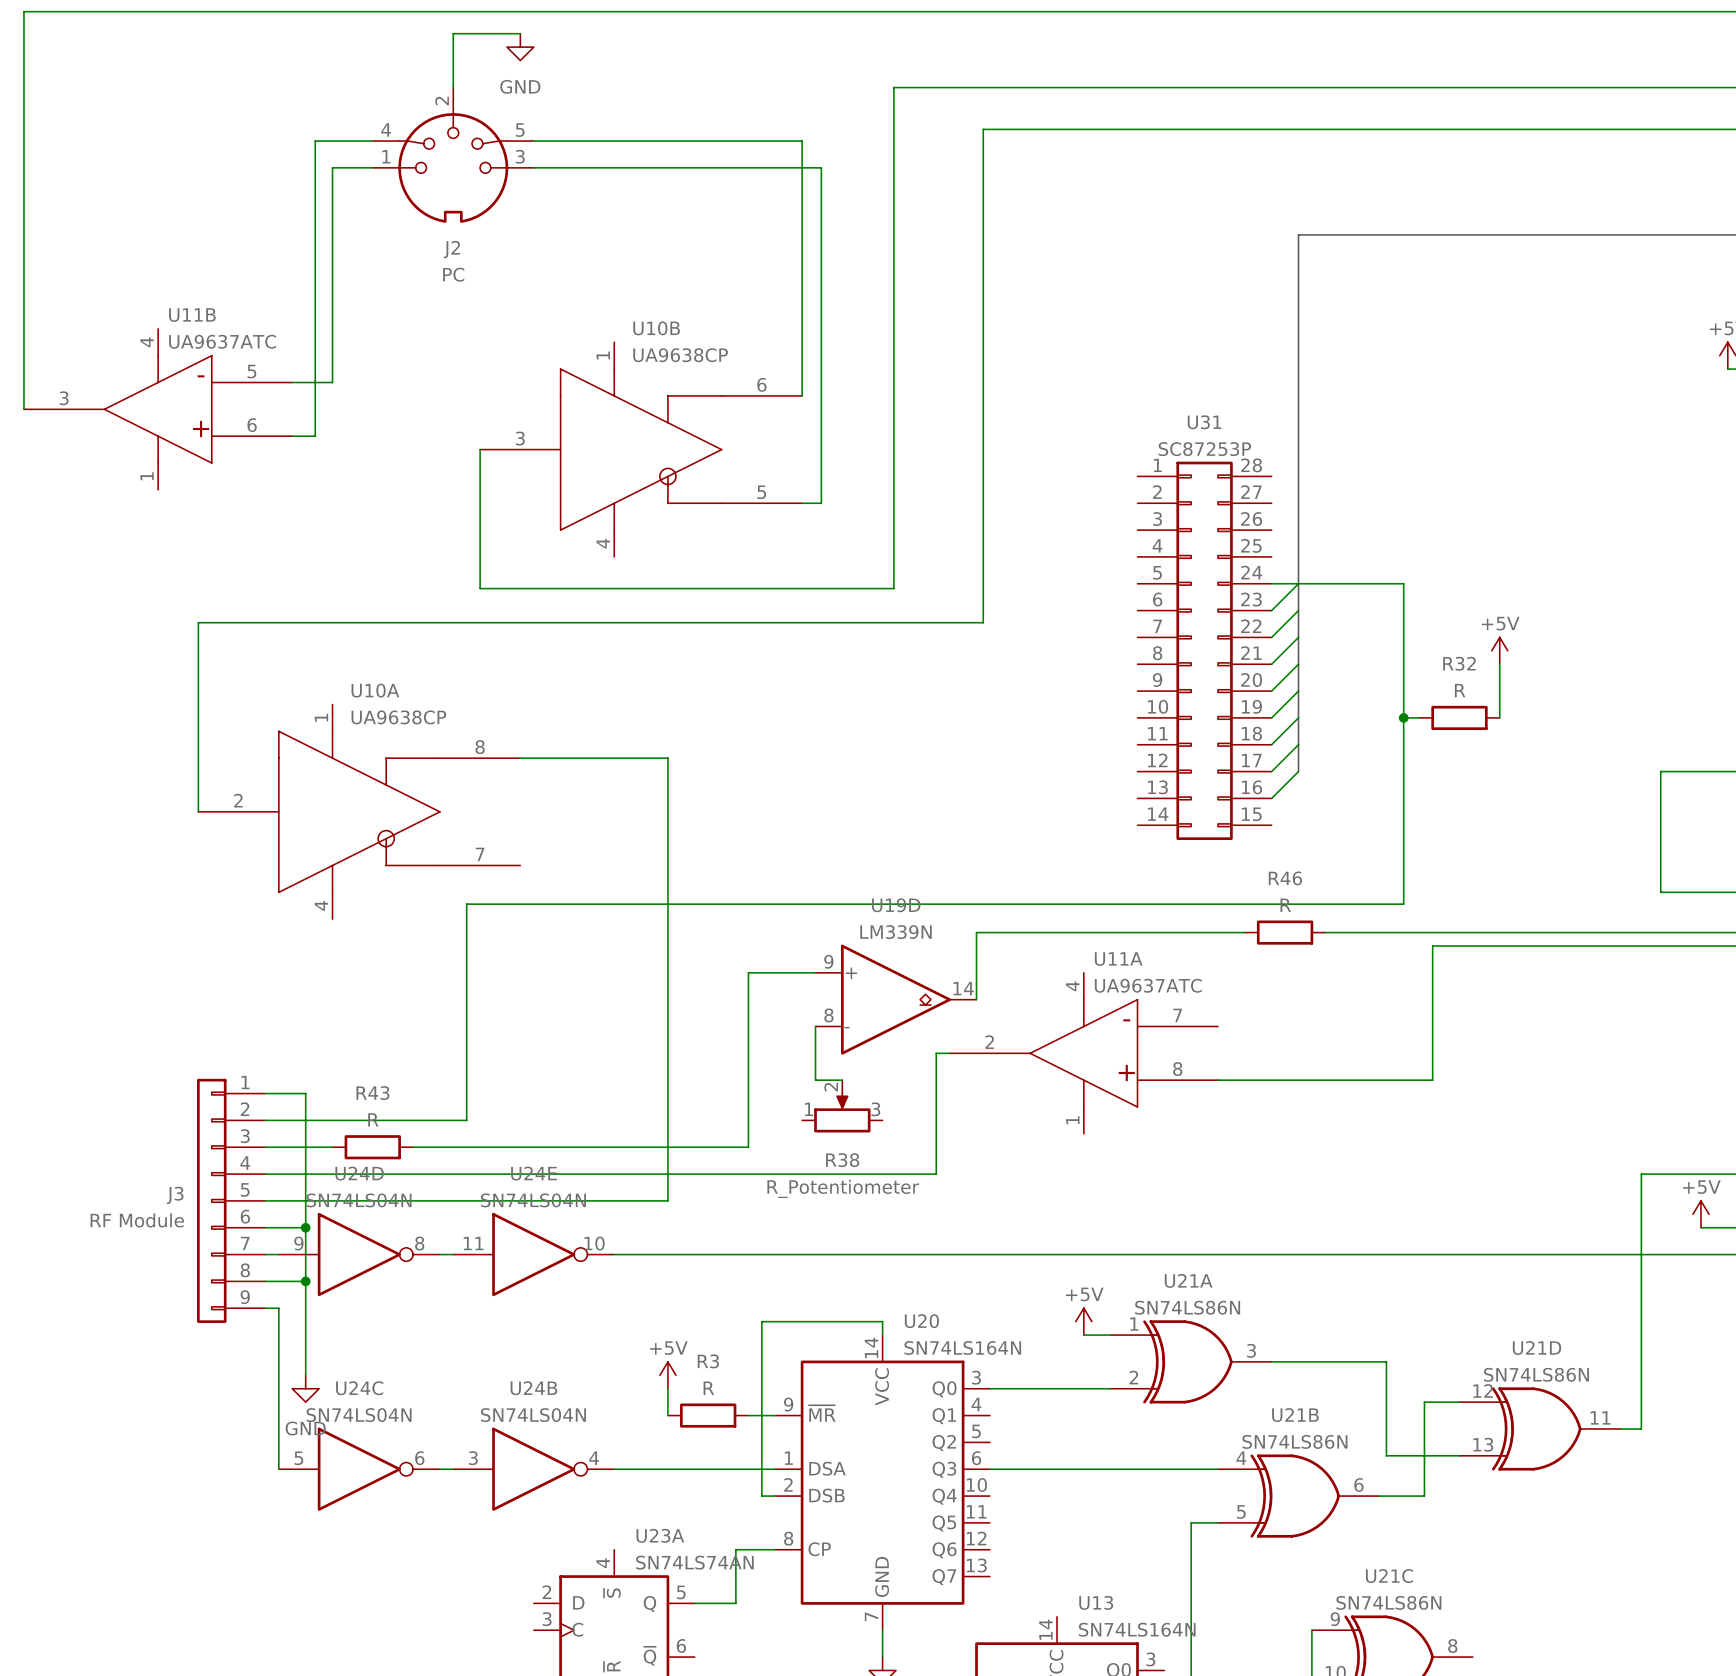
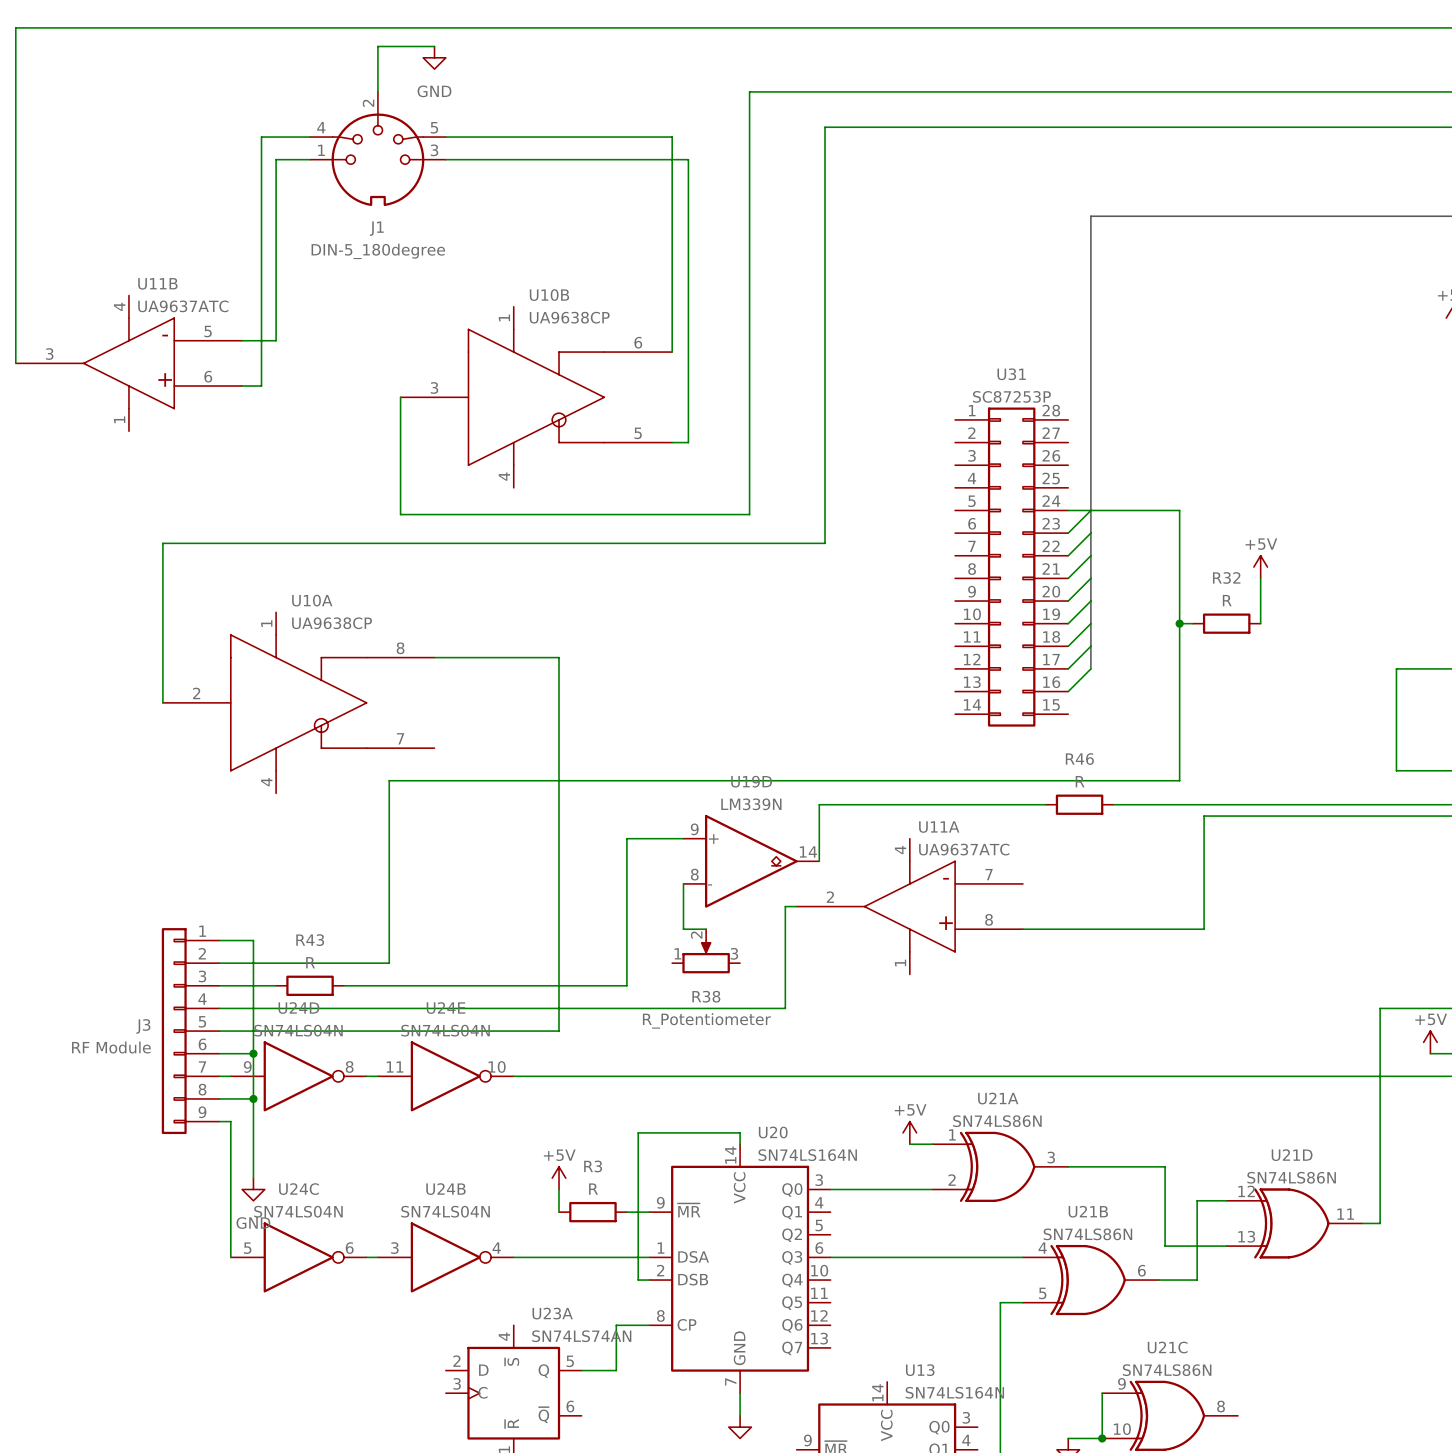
J2 name: J2 (451, 249) -> J1 (376, 228)
J2 value: PC (453, 274) -> DIN-5_180degree (378, 251)

